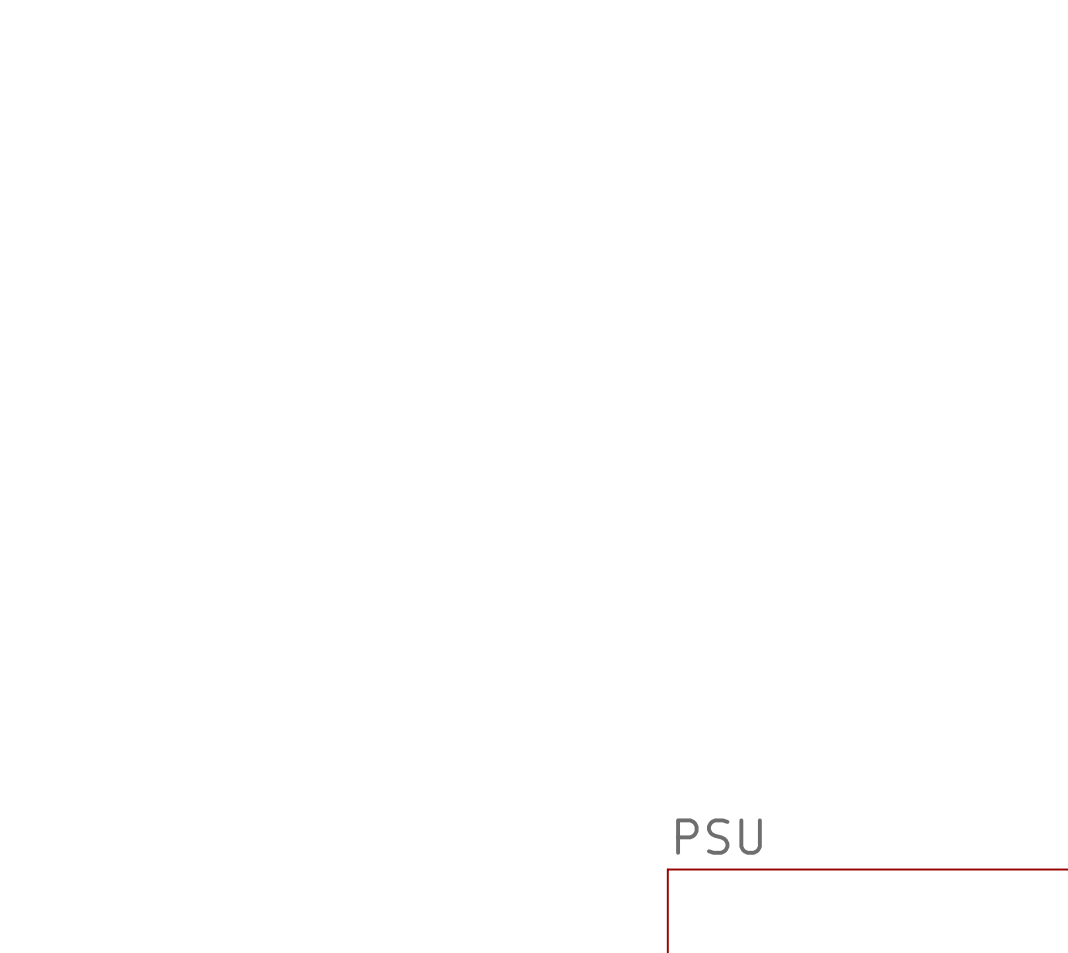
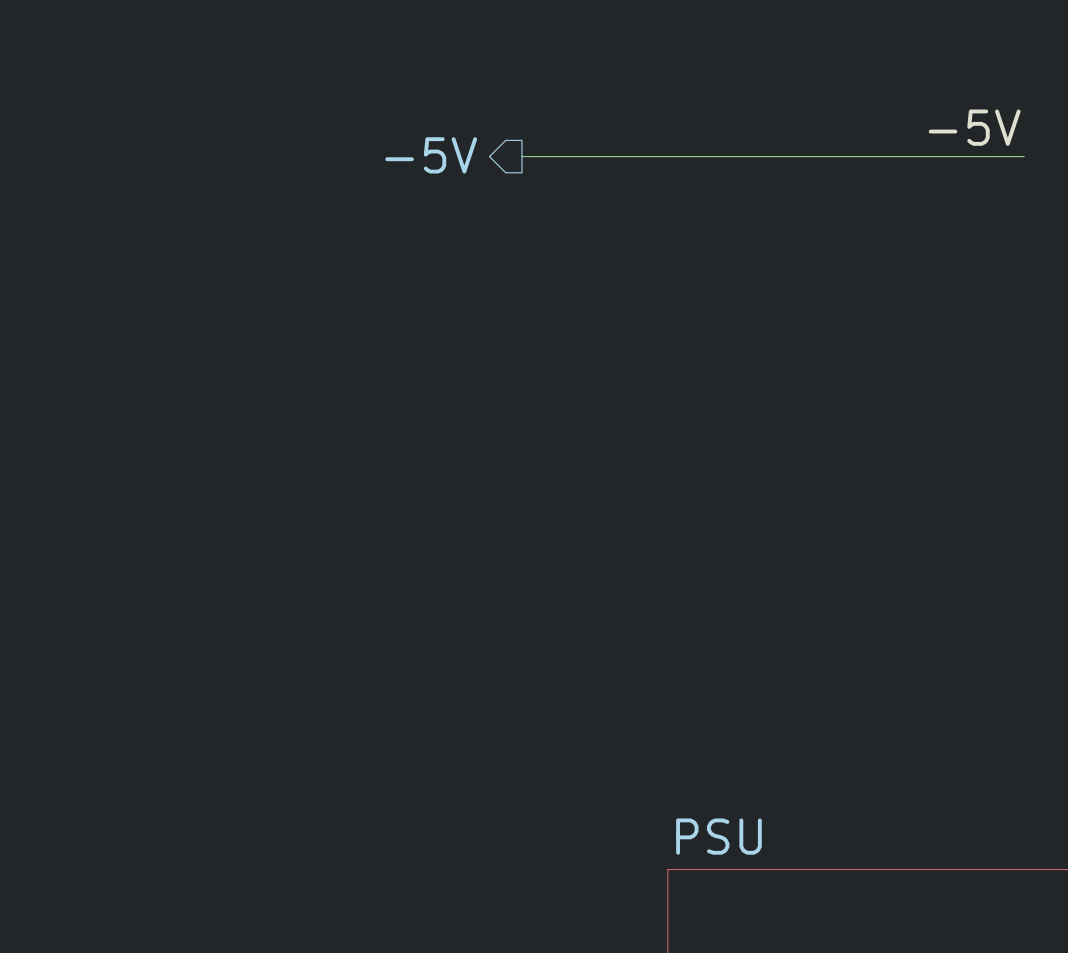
label: none -> -5V (974, 127)
sheet pin: none -> -5V (431, 155)
wire: none -> (521, 156) (1024, 156)

